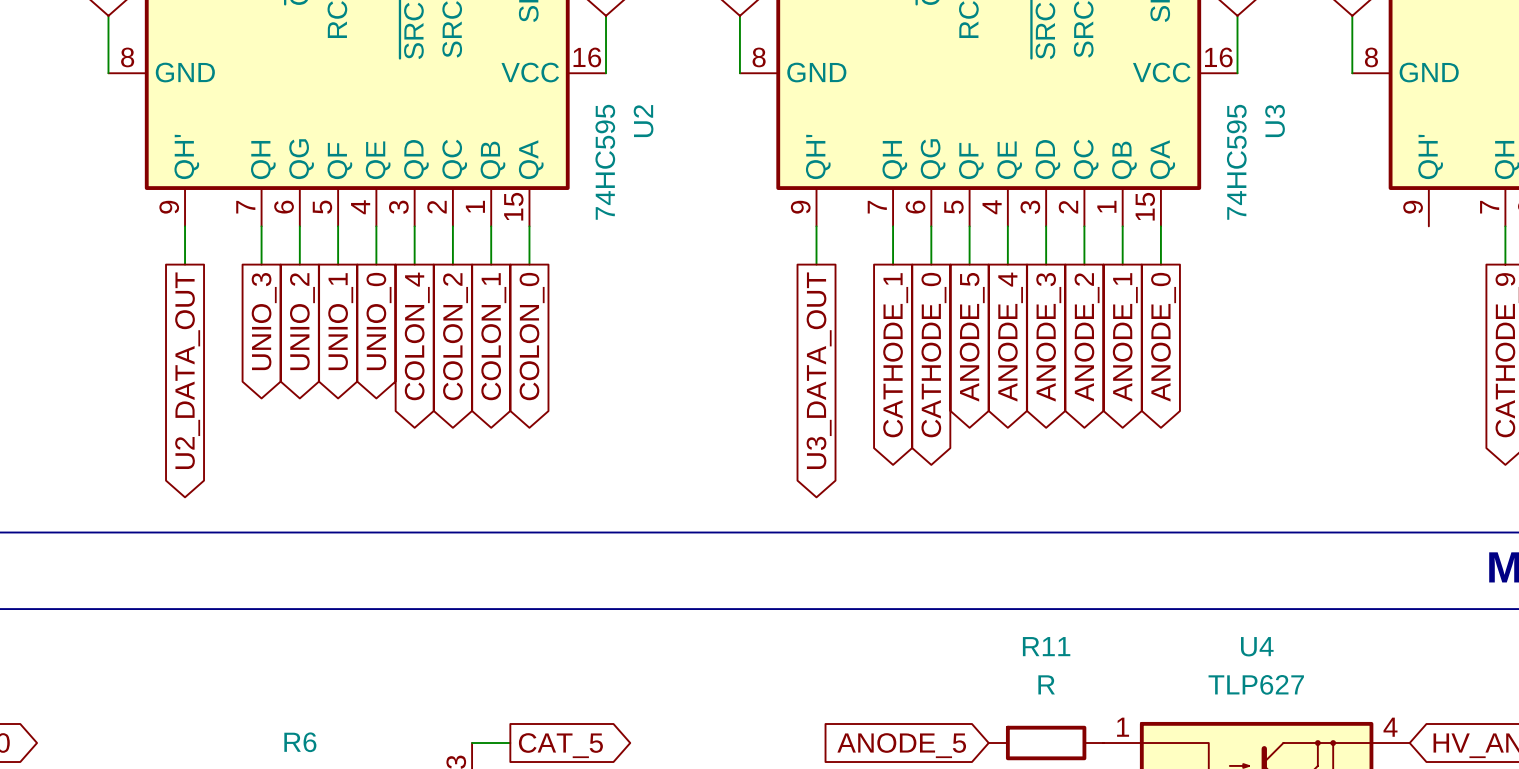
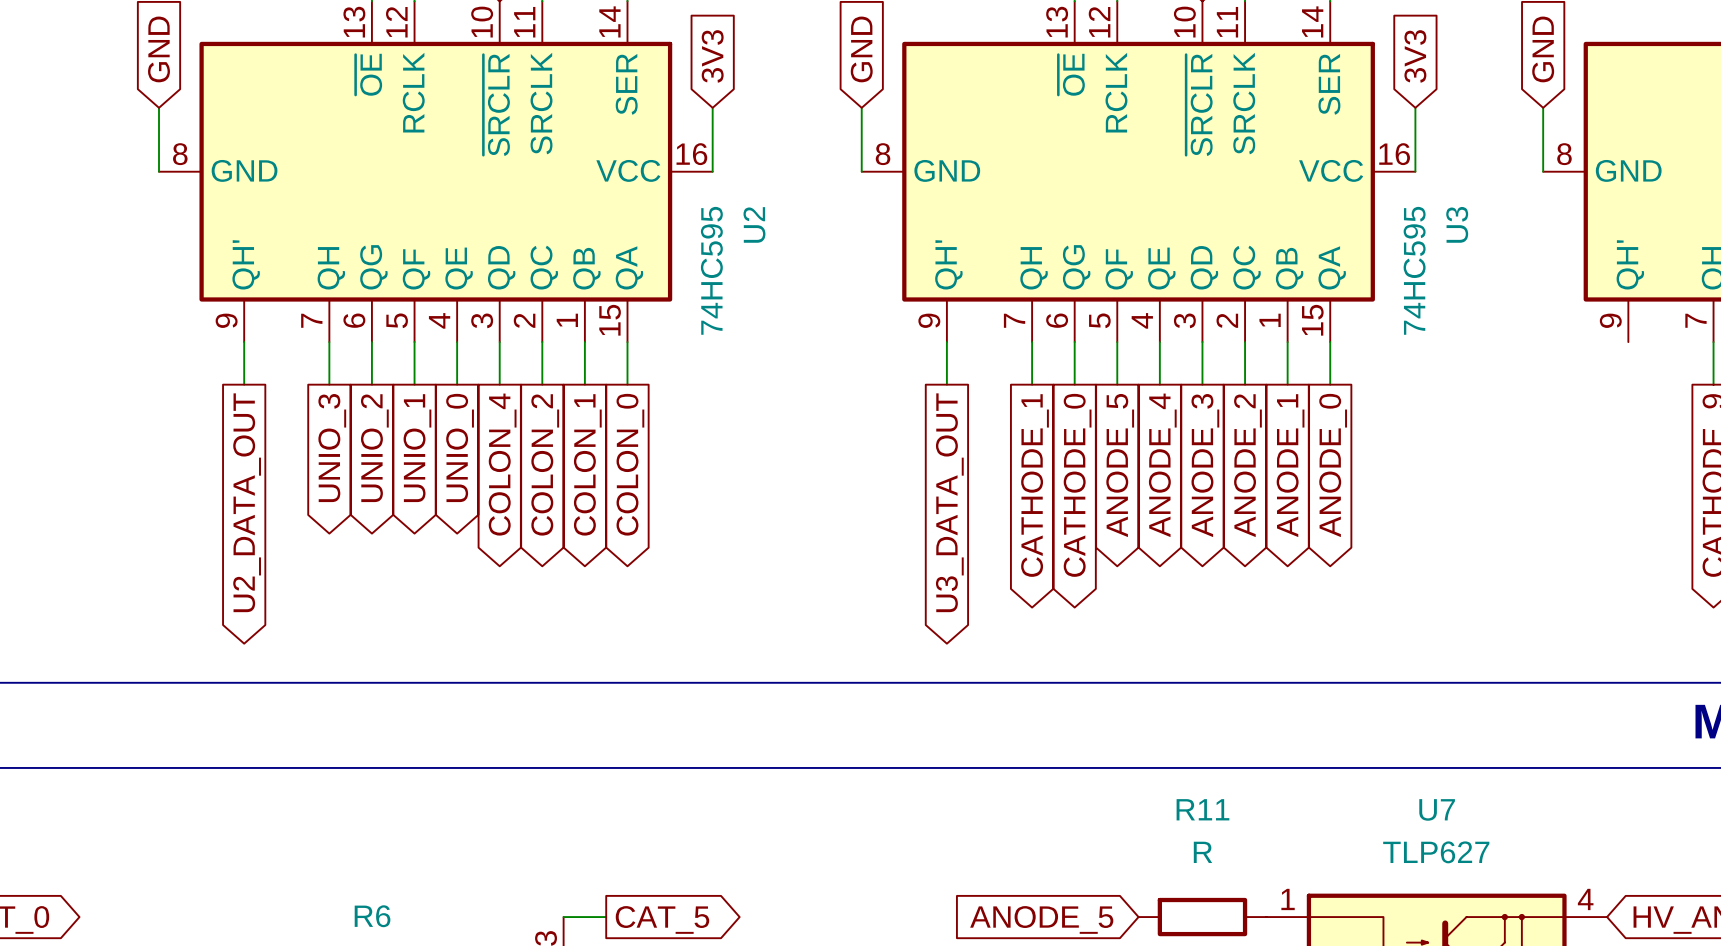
U4 name: U4 (1257, 646) -> U7 (1437, 809)

